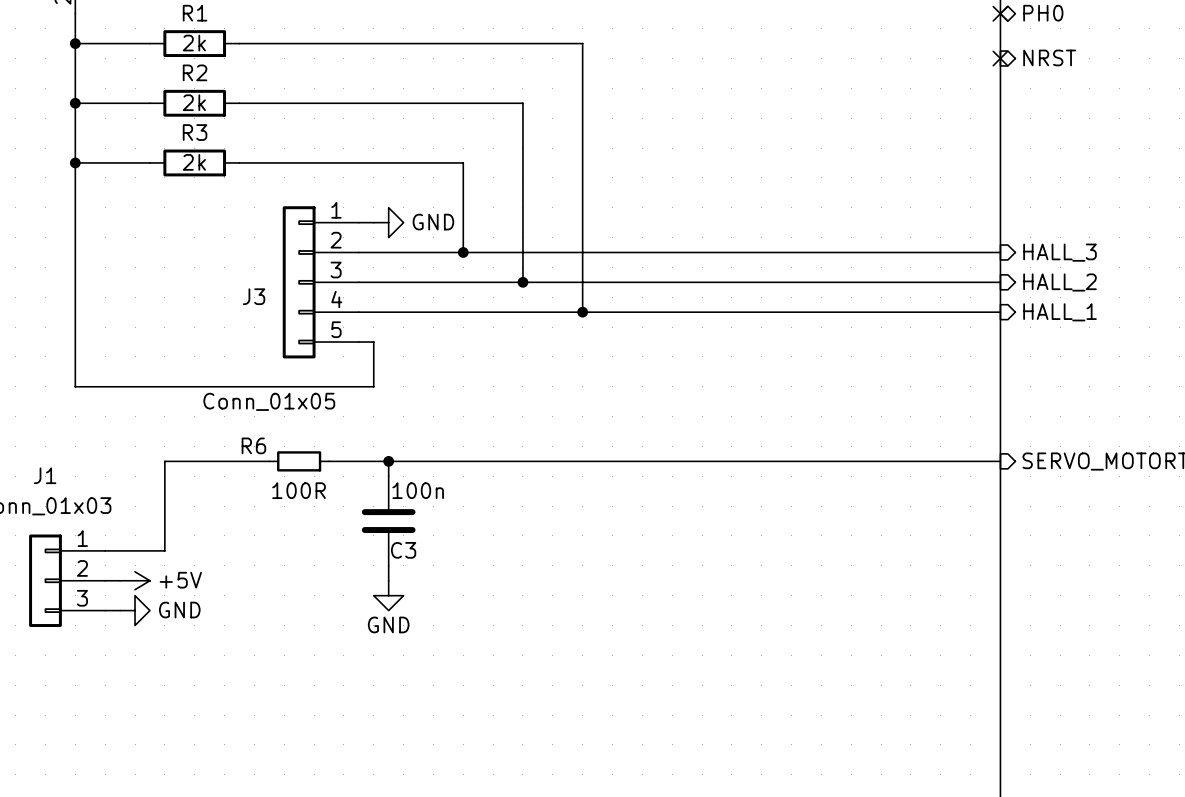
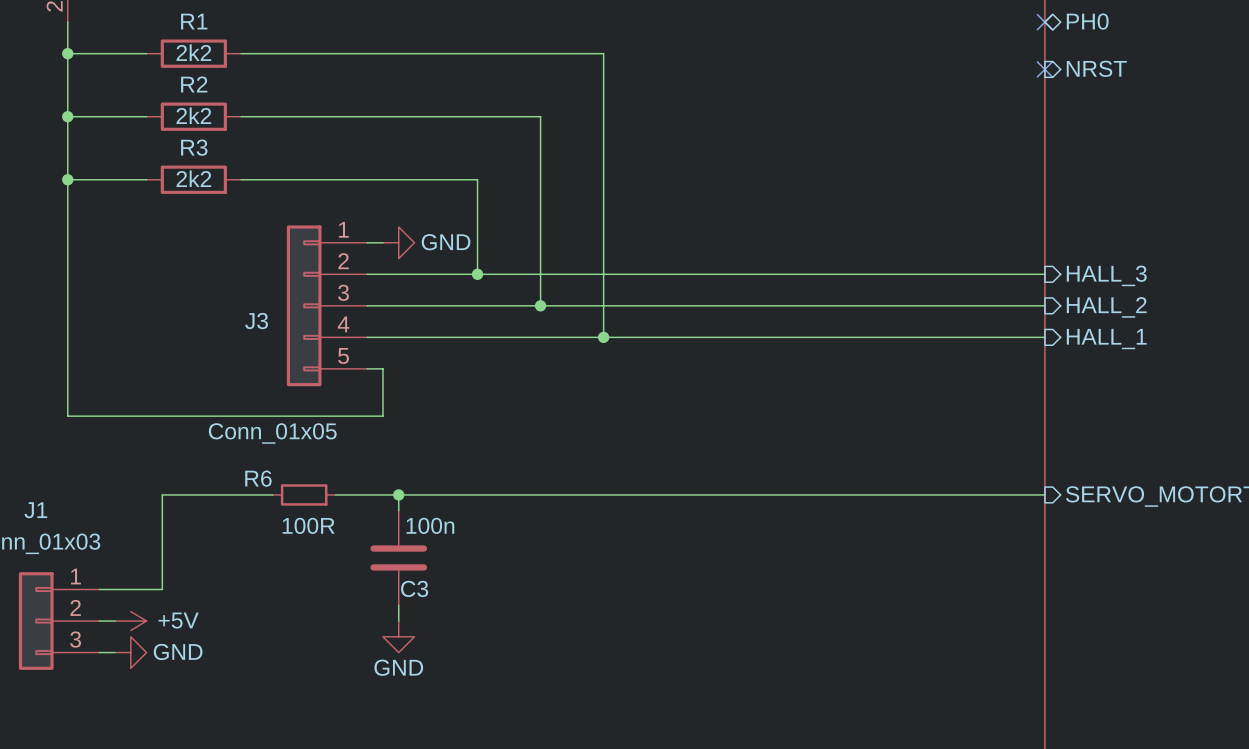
R1 value: 2k (194, 43) -> 2k2 (193, 52)
R2 value: 2k (194, 102) -> 2k2 (193, 115)
R3 value: 2k (194, 162) -> 2k2 (193, 178)

